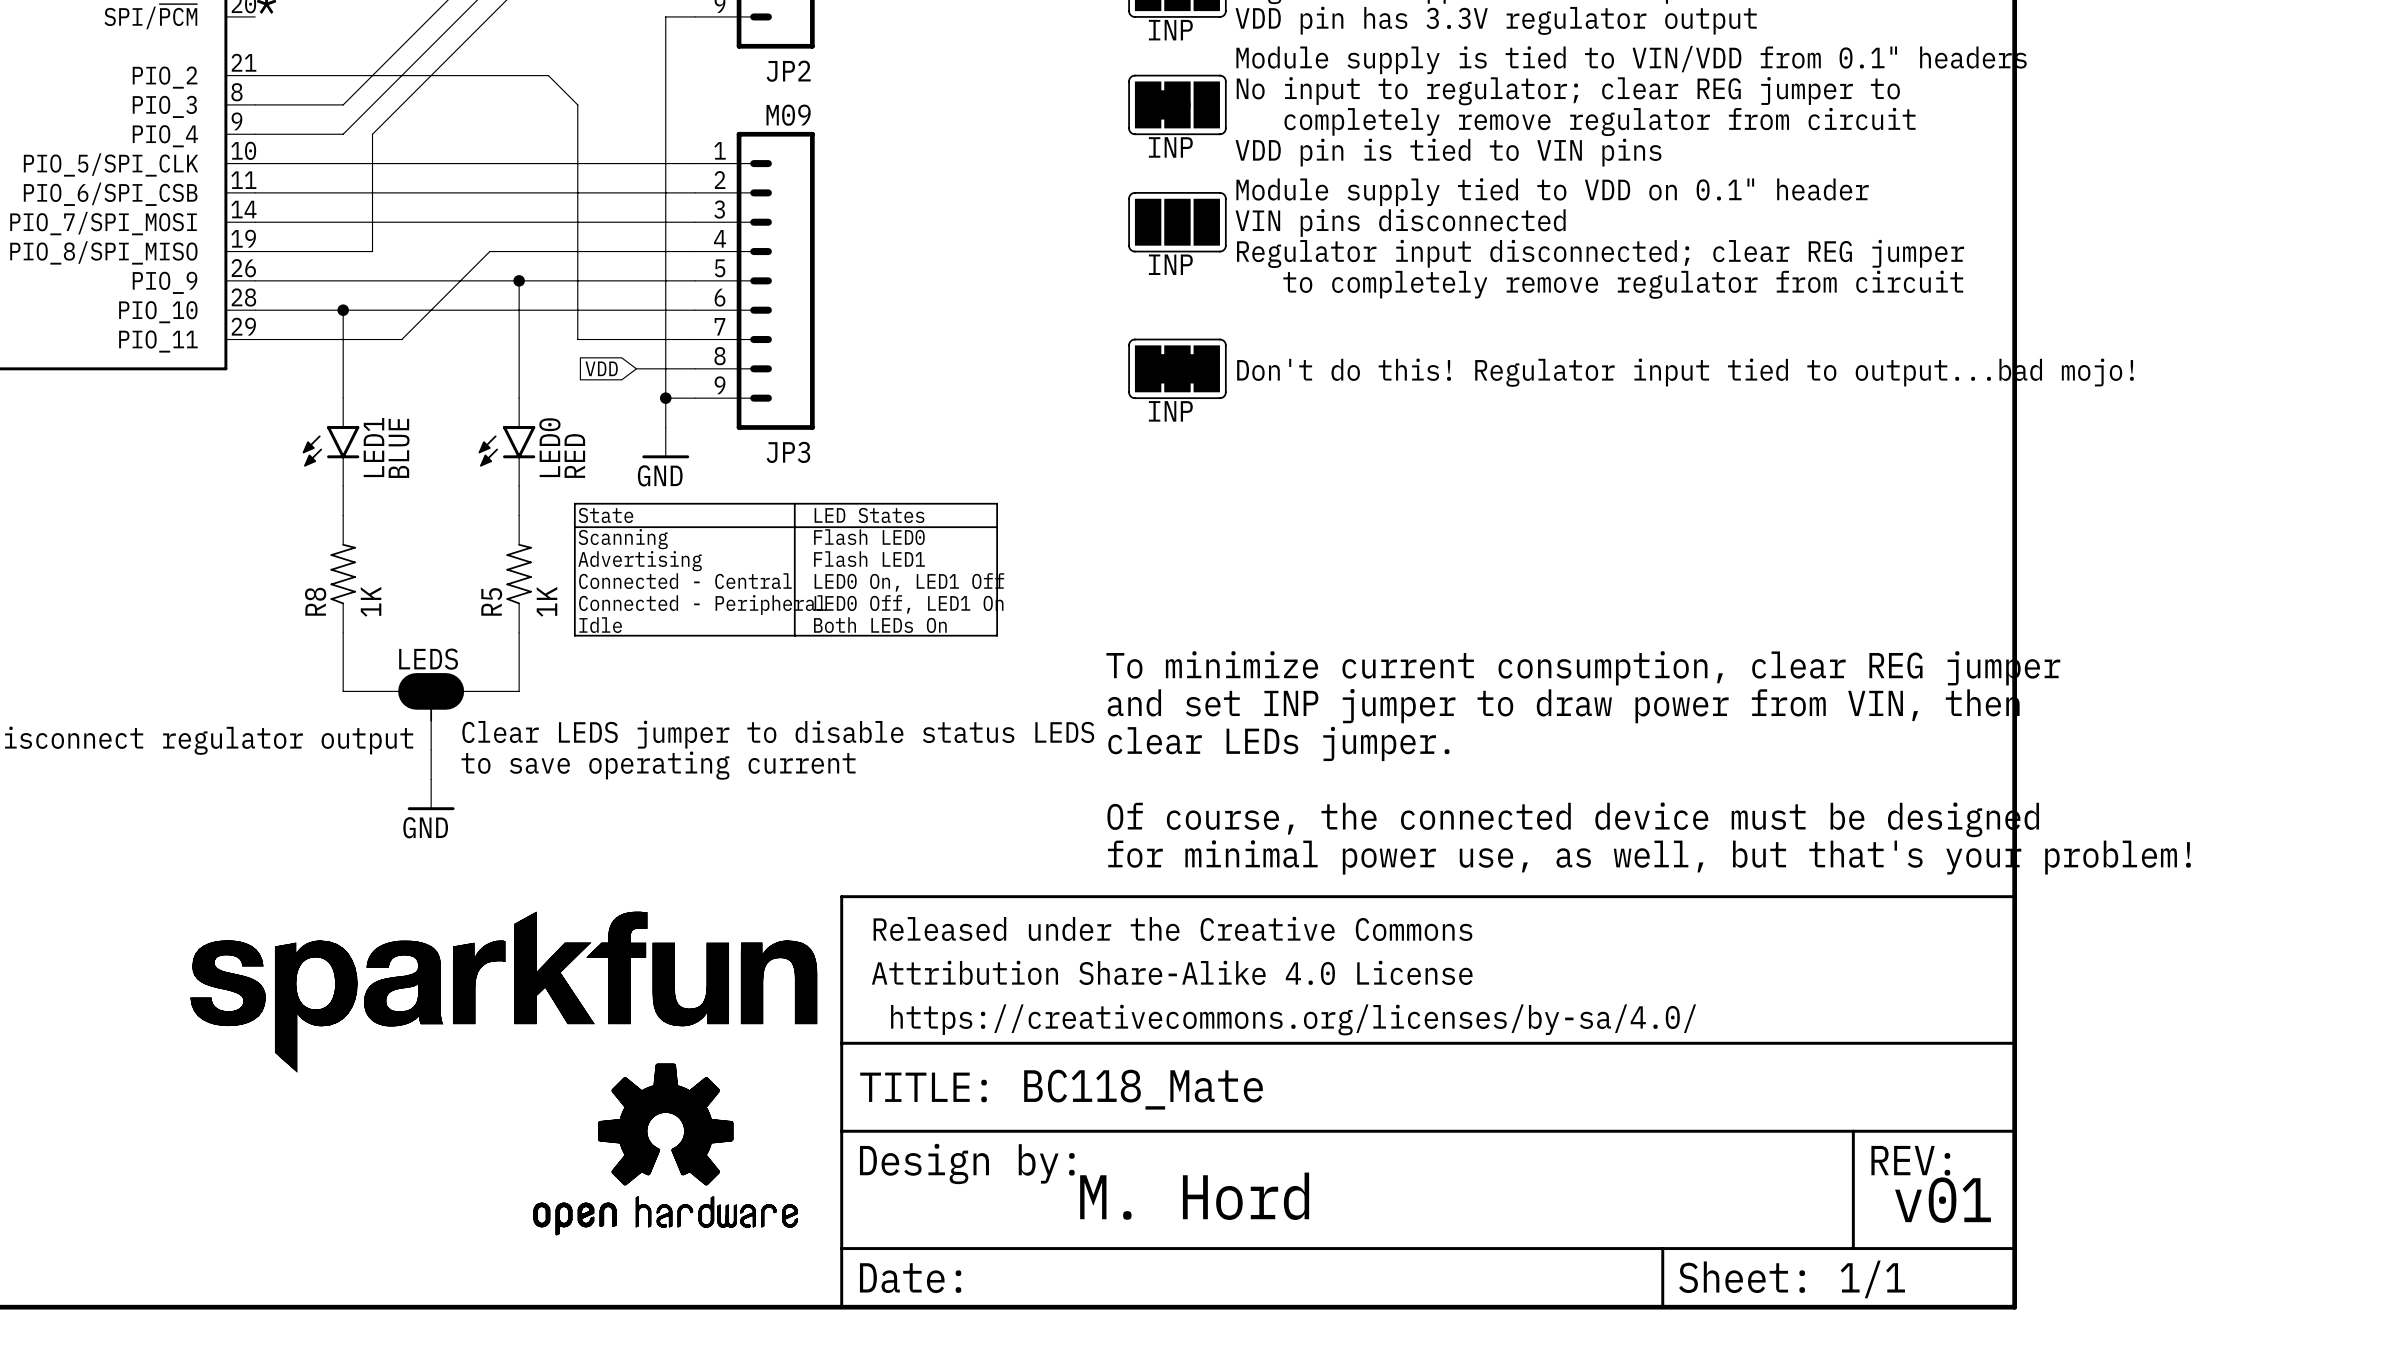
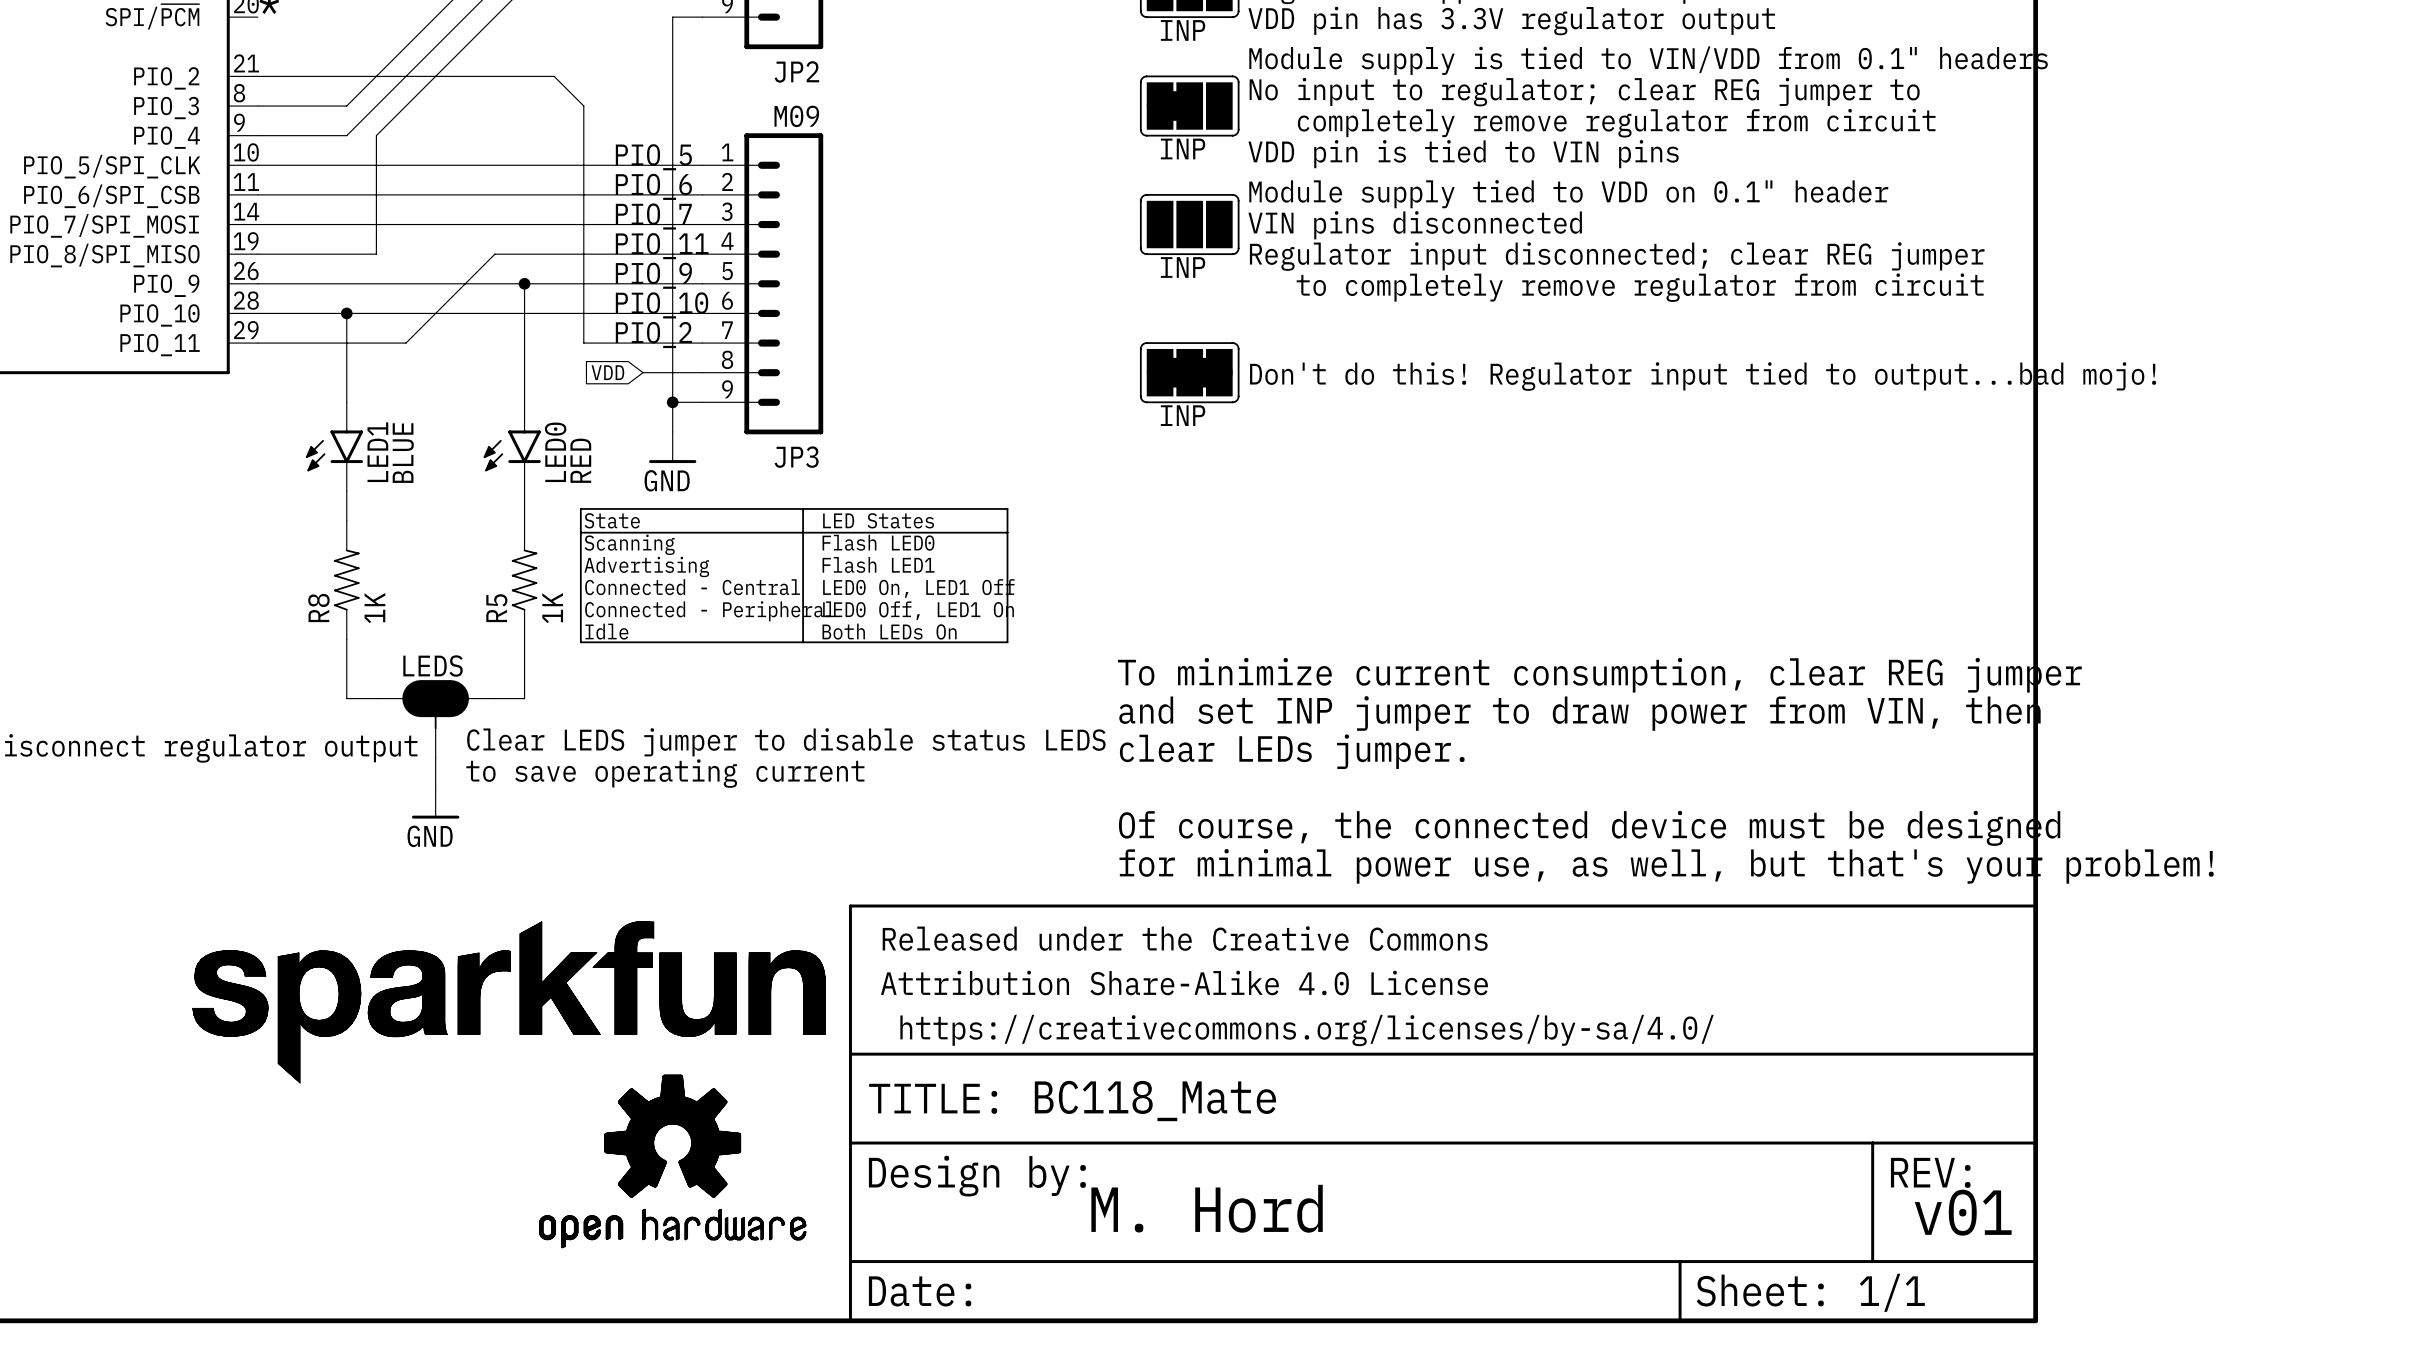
label: none -> PIO_5 (653, 157)
label: none -> PIO_6 (653, 186)
label: none -> PIO_7 (653, 216)
label: none -> PIO_11 (662, 246)
label: none -> PIO_9 (653, 275)
label: none -> PIO_10 (662, 305)
label: none -> PIO_2 (653, 335)

